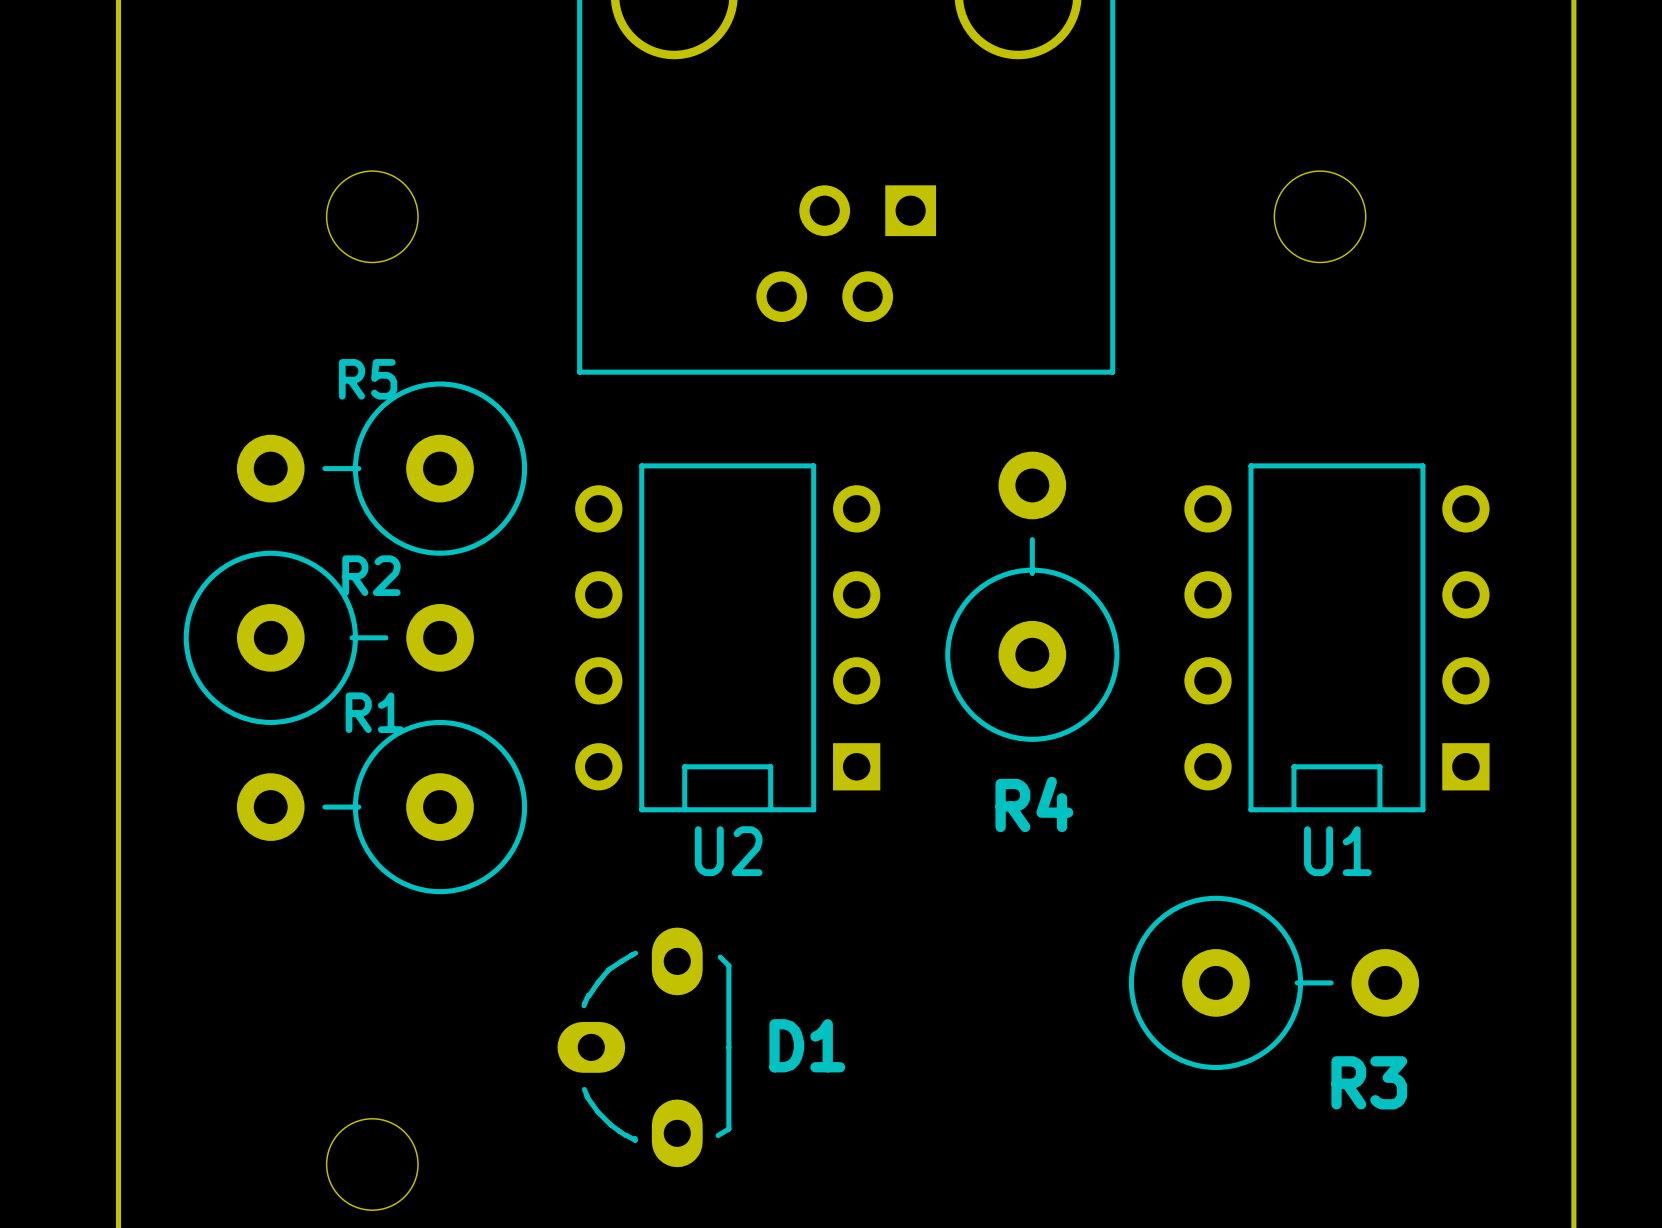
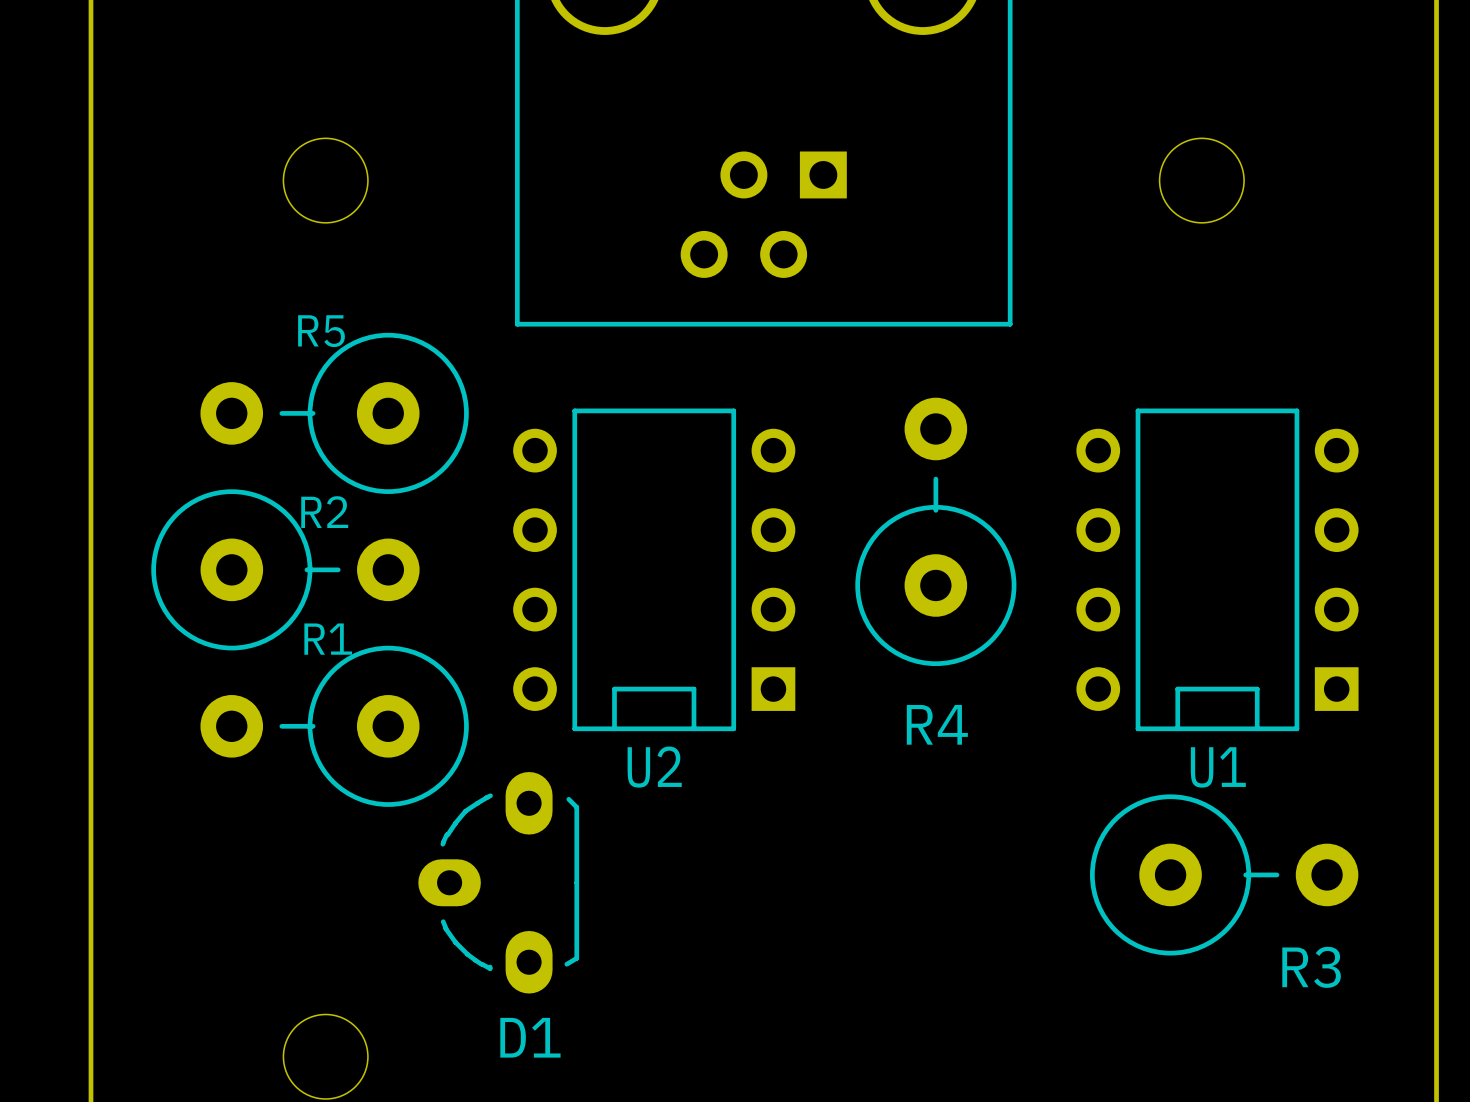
R3 position: (1273, 982) -> (1224, 874)
D1 name position: D1 (807, 1045) -> D1 (530, 1037)
D1 position: (644, 1047) -> (498, 882)

